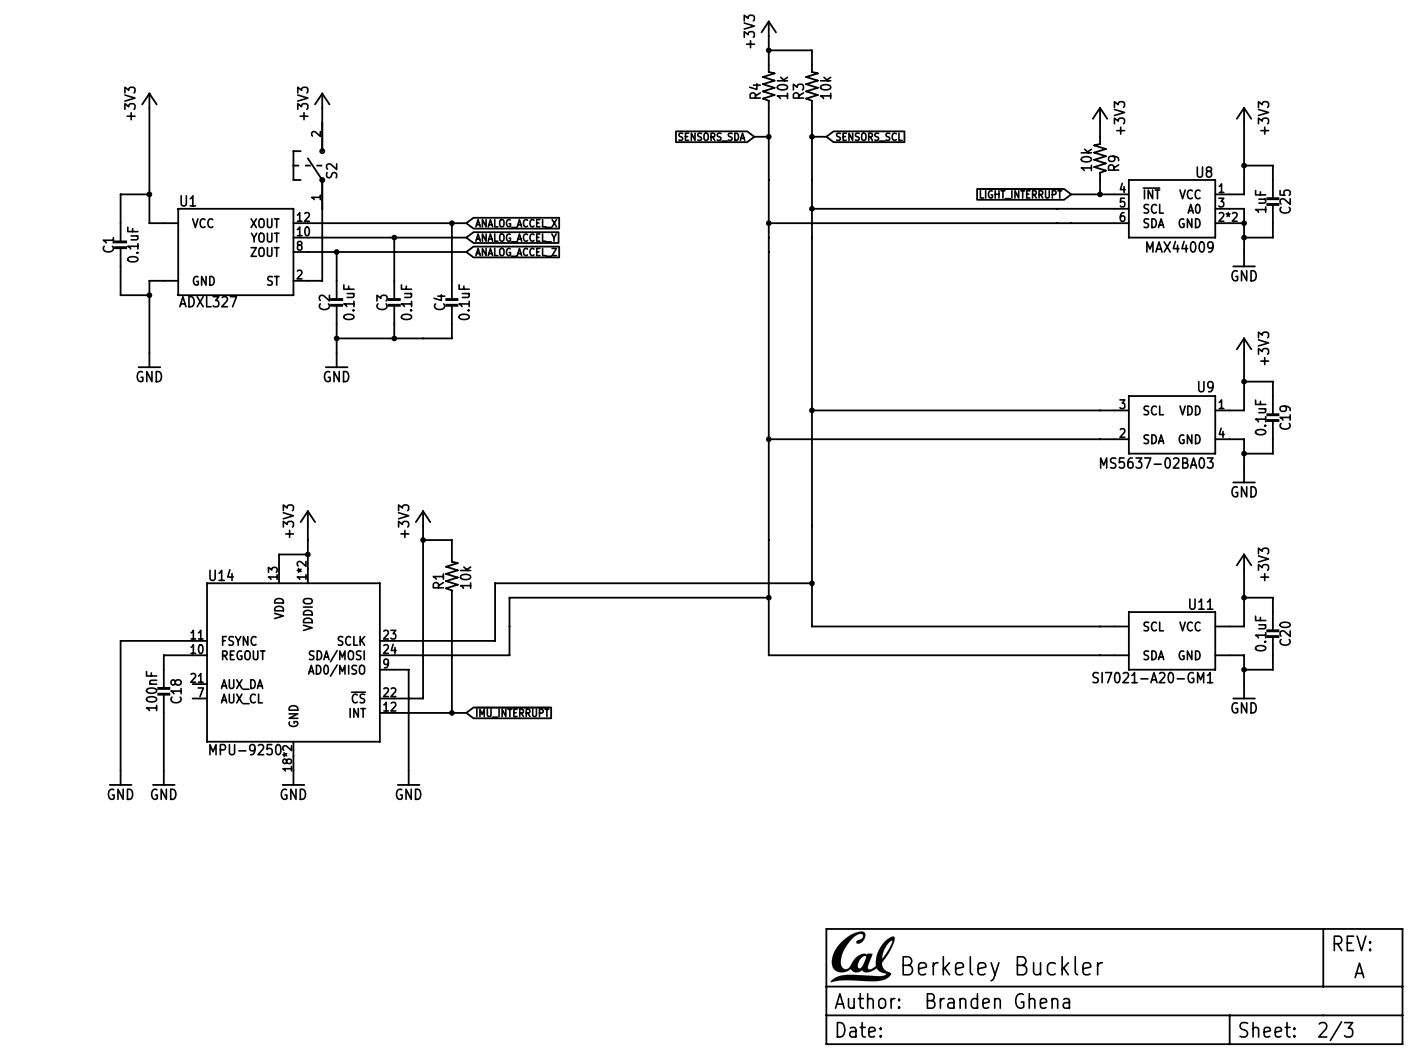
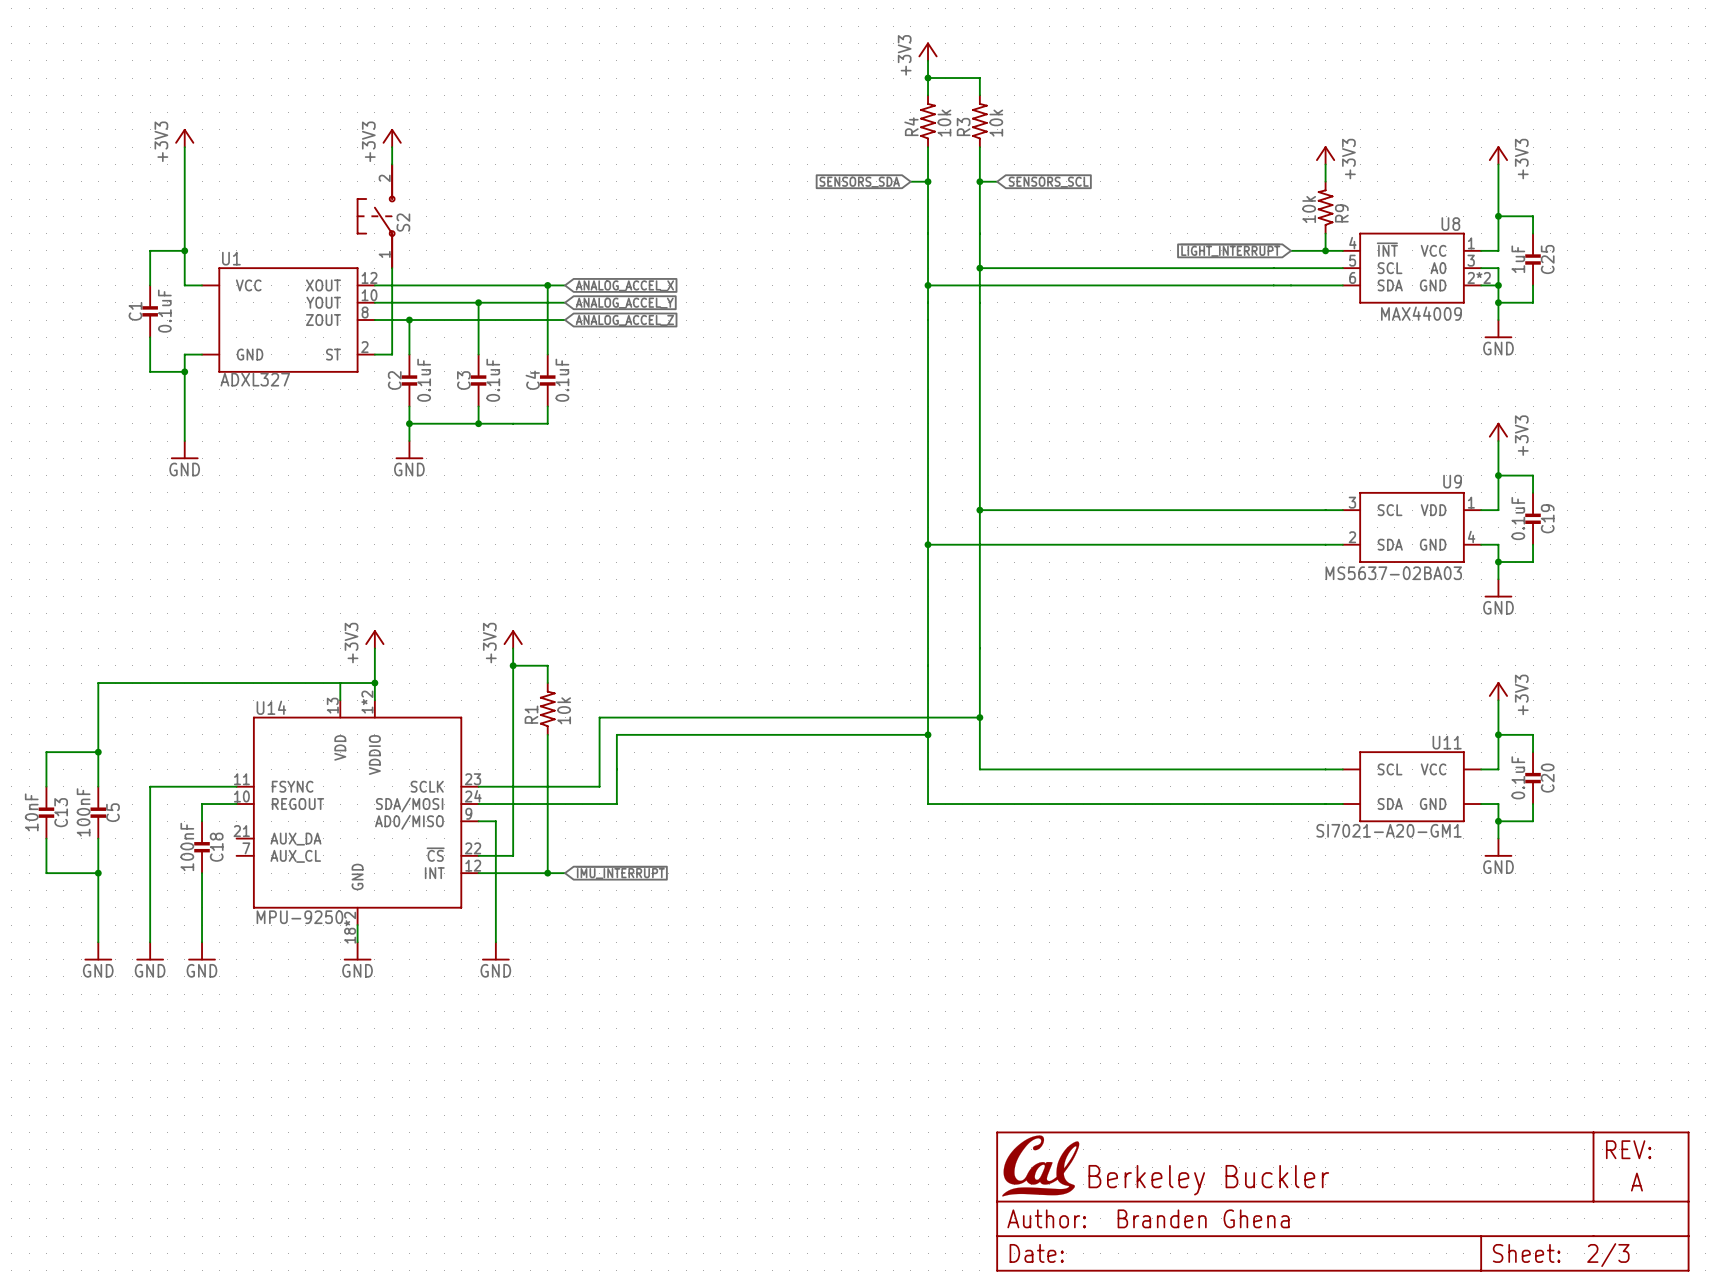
wire: none -> (340, 683) (98, 683) (98, 786)
wire: none -> (98, 752) (46, 752) (46, 786)
junction: none -> (98, 752)
C13: none -> 10nF (46, 812)
C5: none -> 100nF (98, 812)
wire: none -> (46, 838) (46, 873) (98, 873)
wire: none -> (98, 838) (98, 942)
junction: none -> (98, 873)
power symbol: none -> GND (98, 951)

